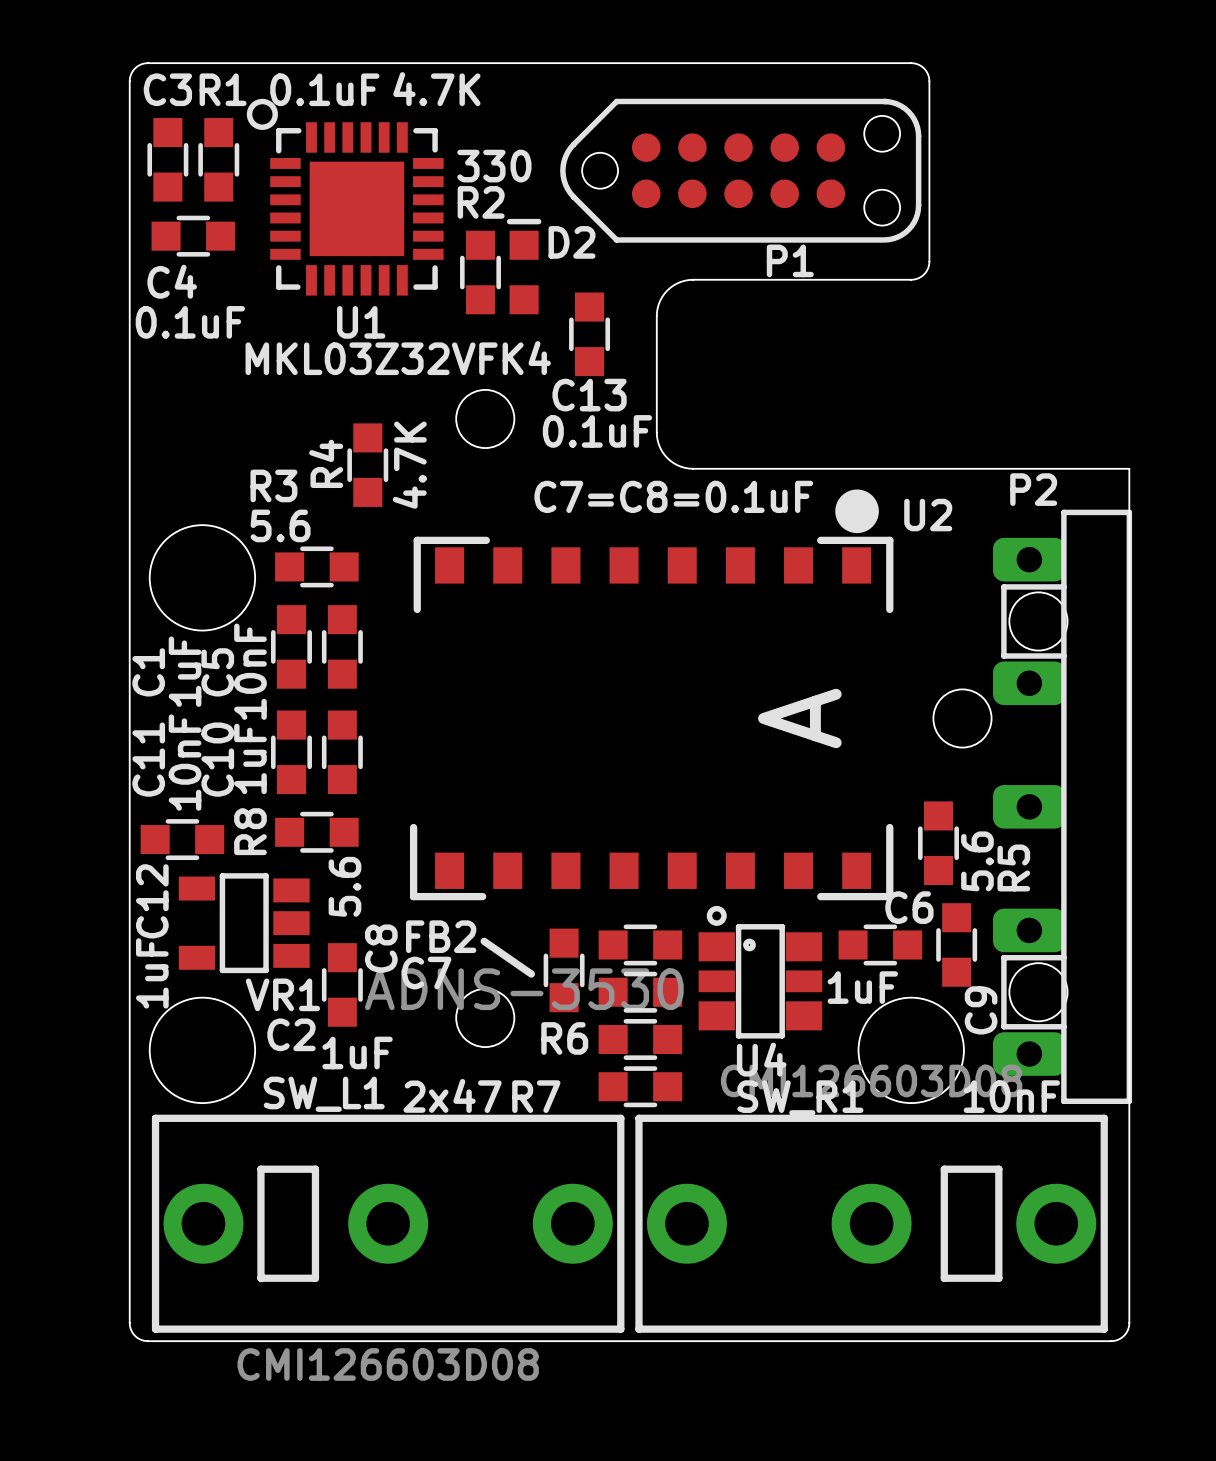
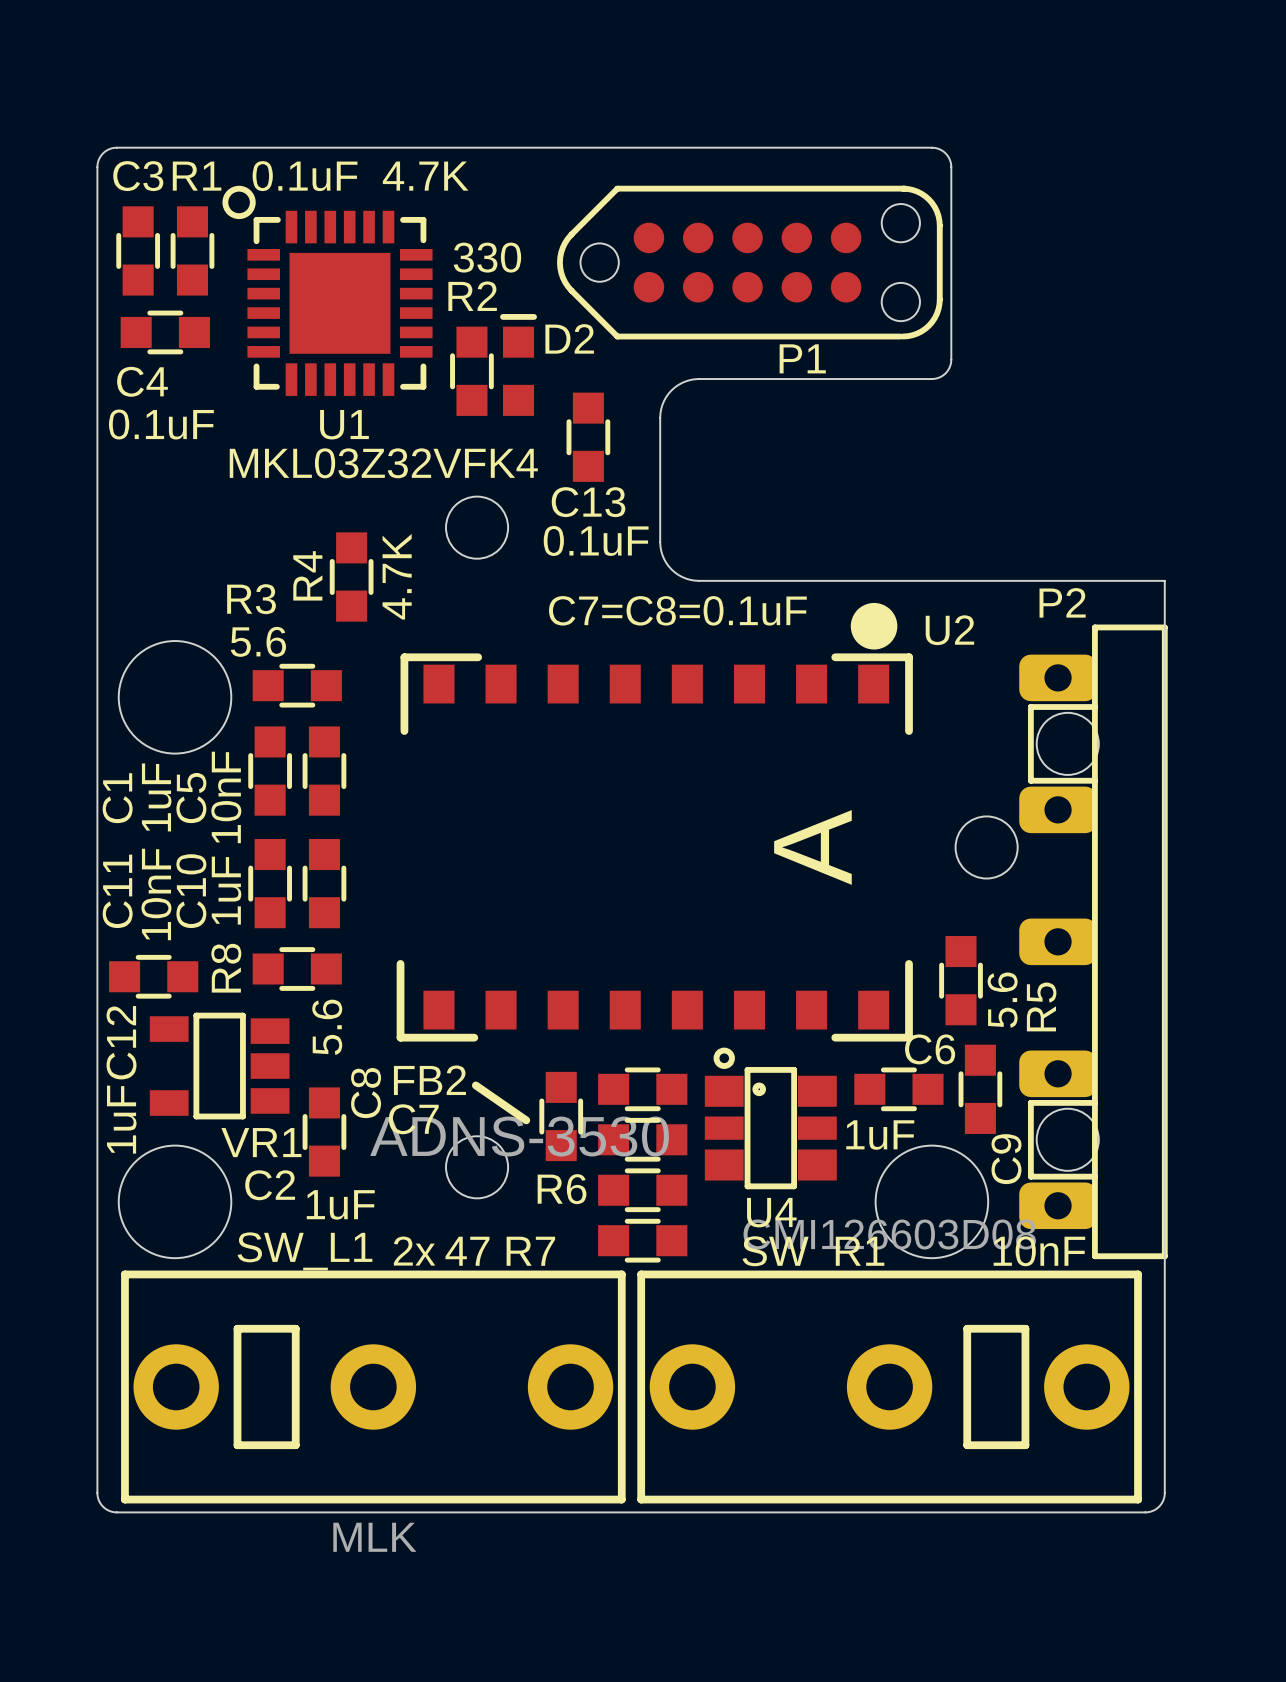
SW_L1 value: CMI126603D08 (388, 1364) -> MLK (374, 1537)

